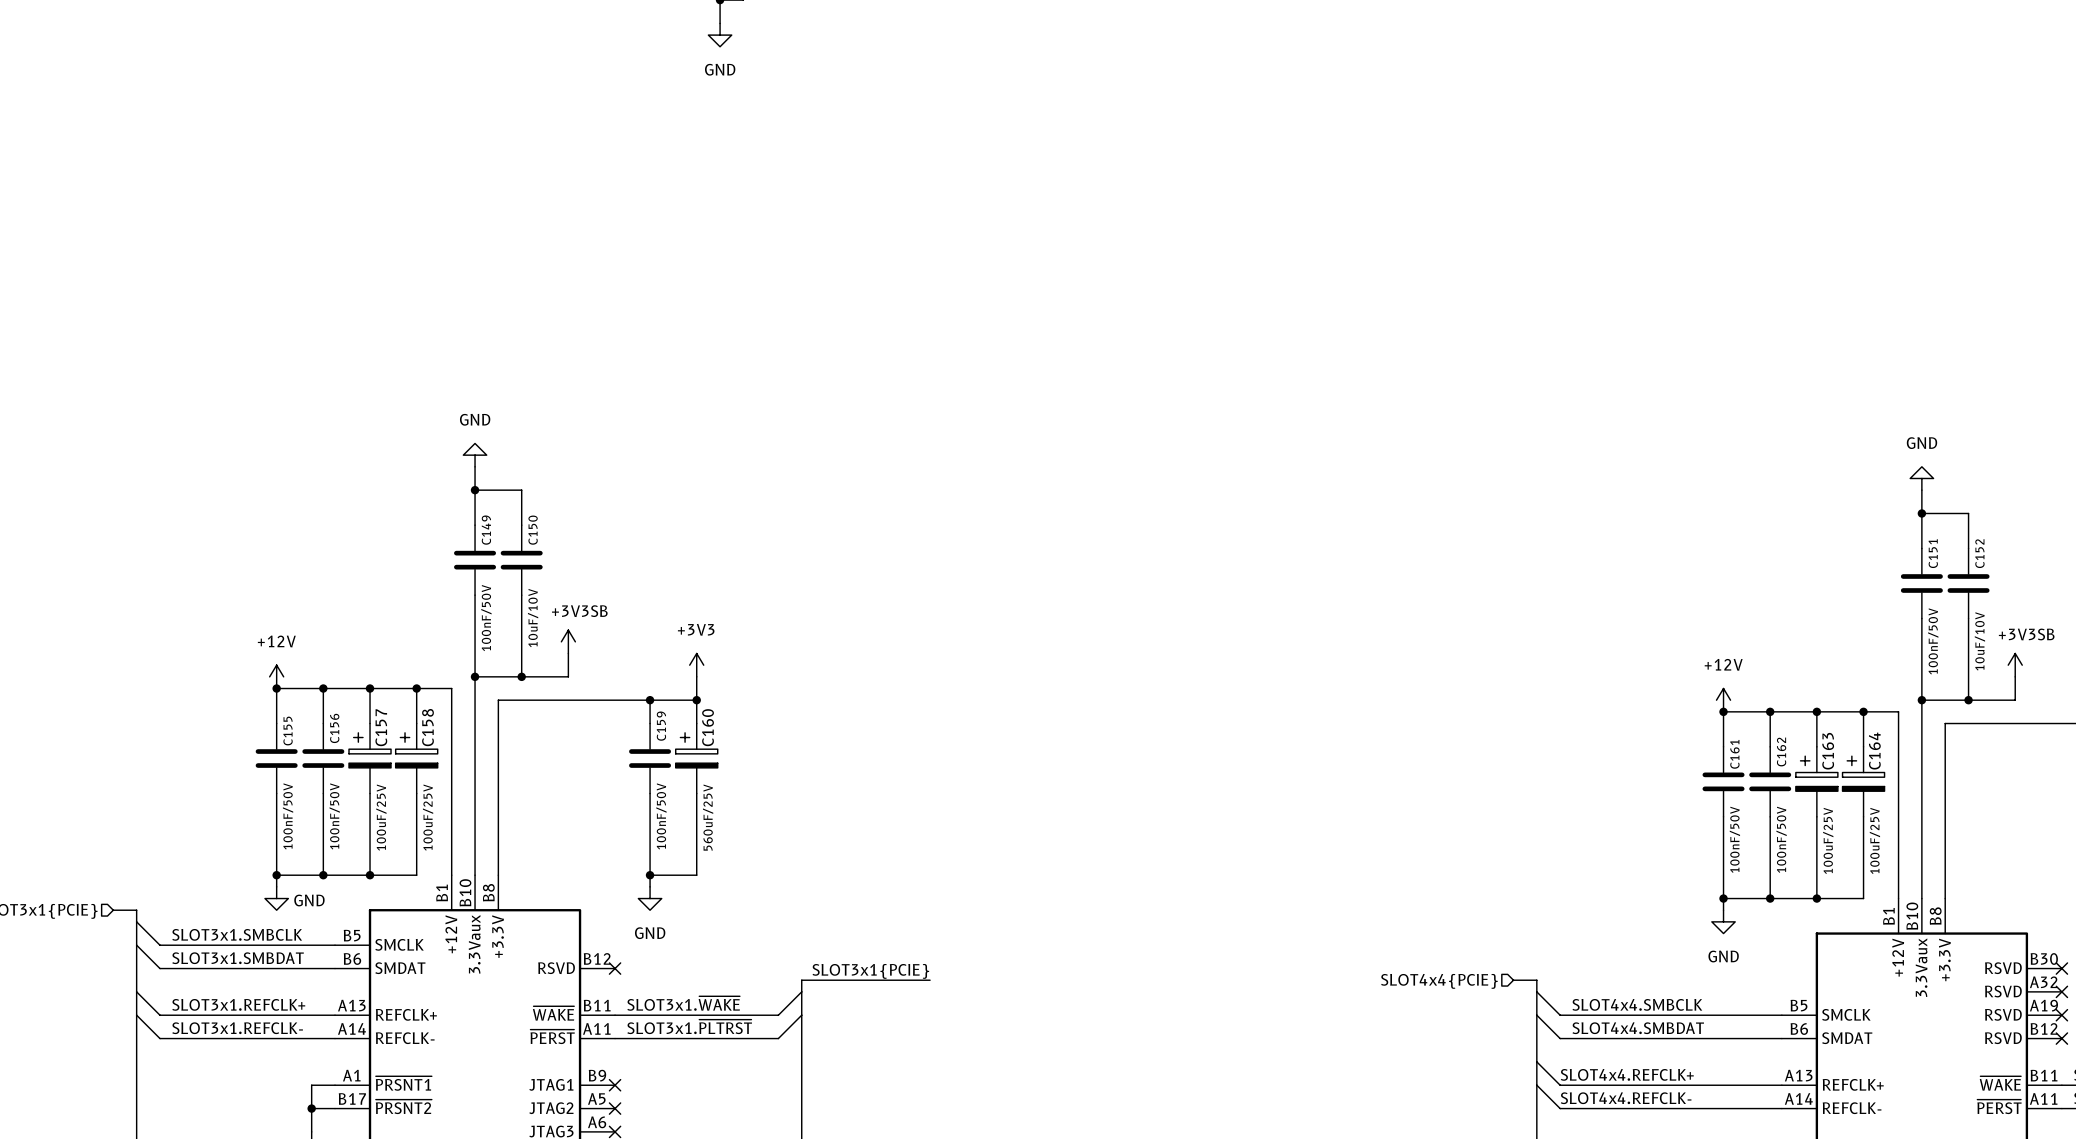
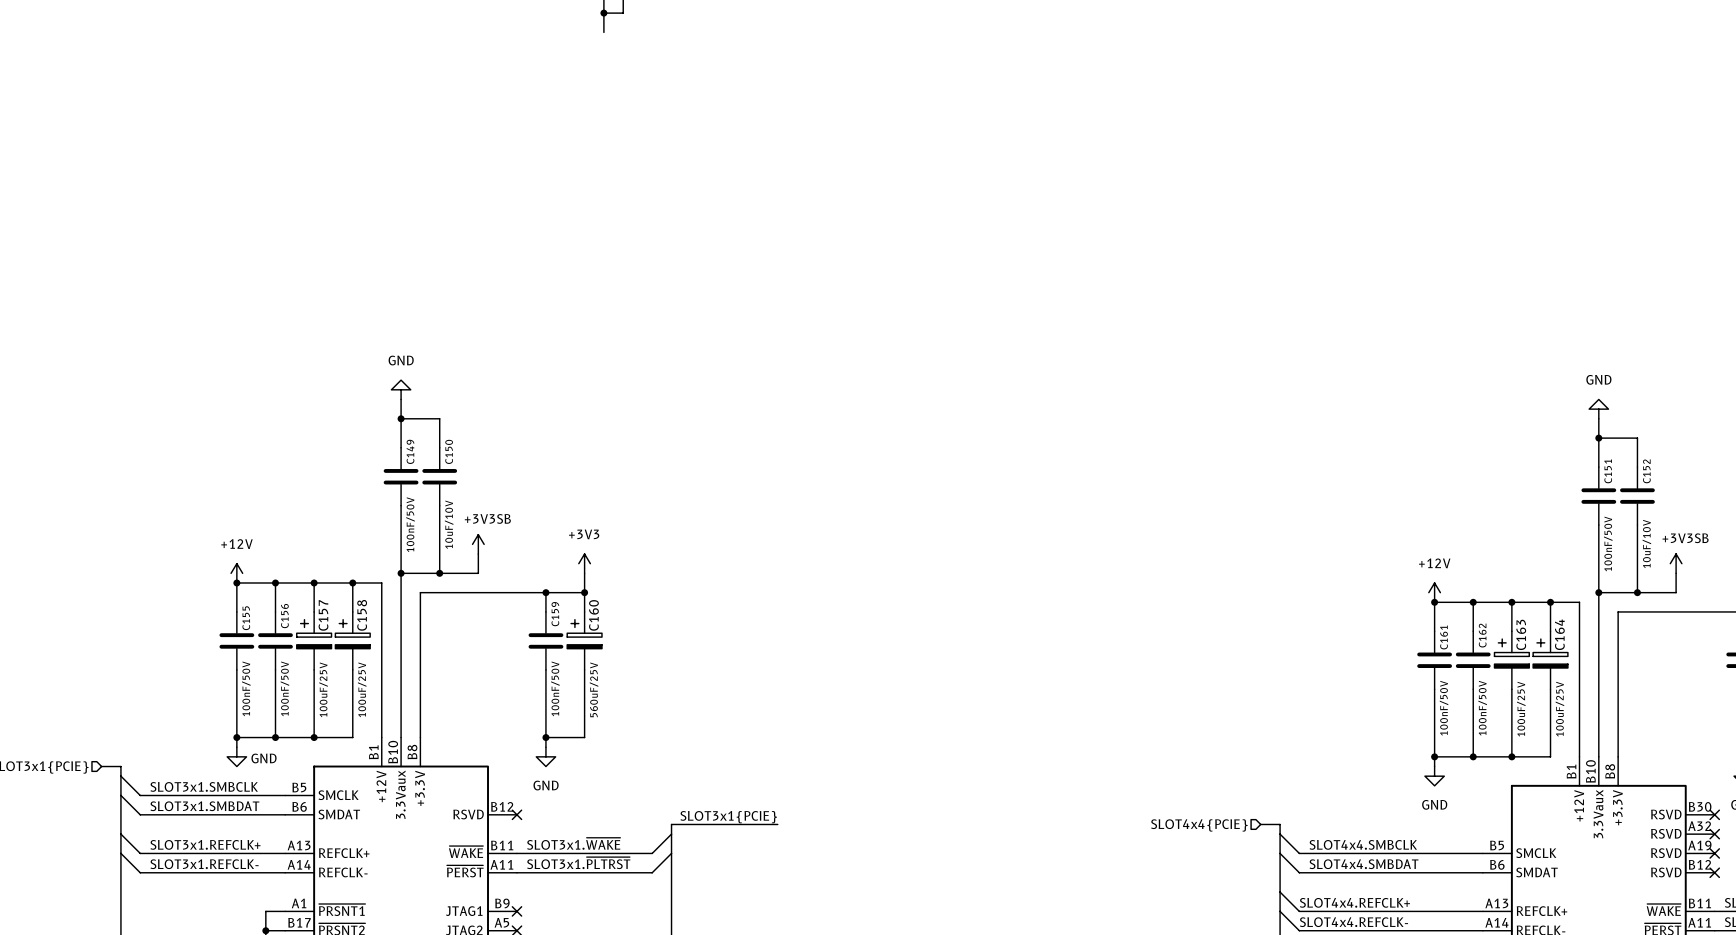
power symbol: GND (720, 35) -> none

